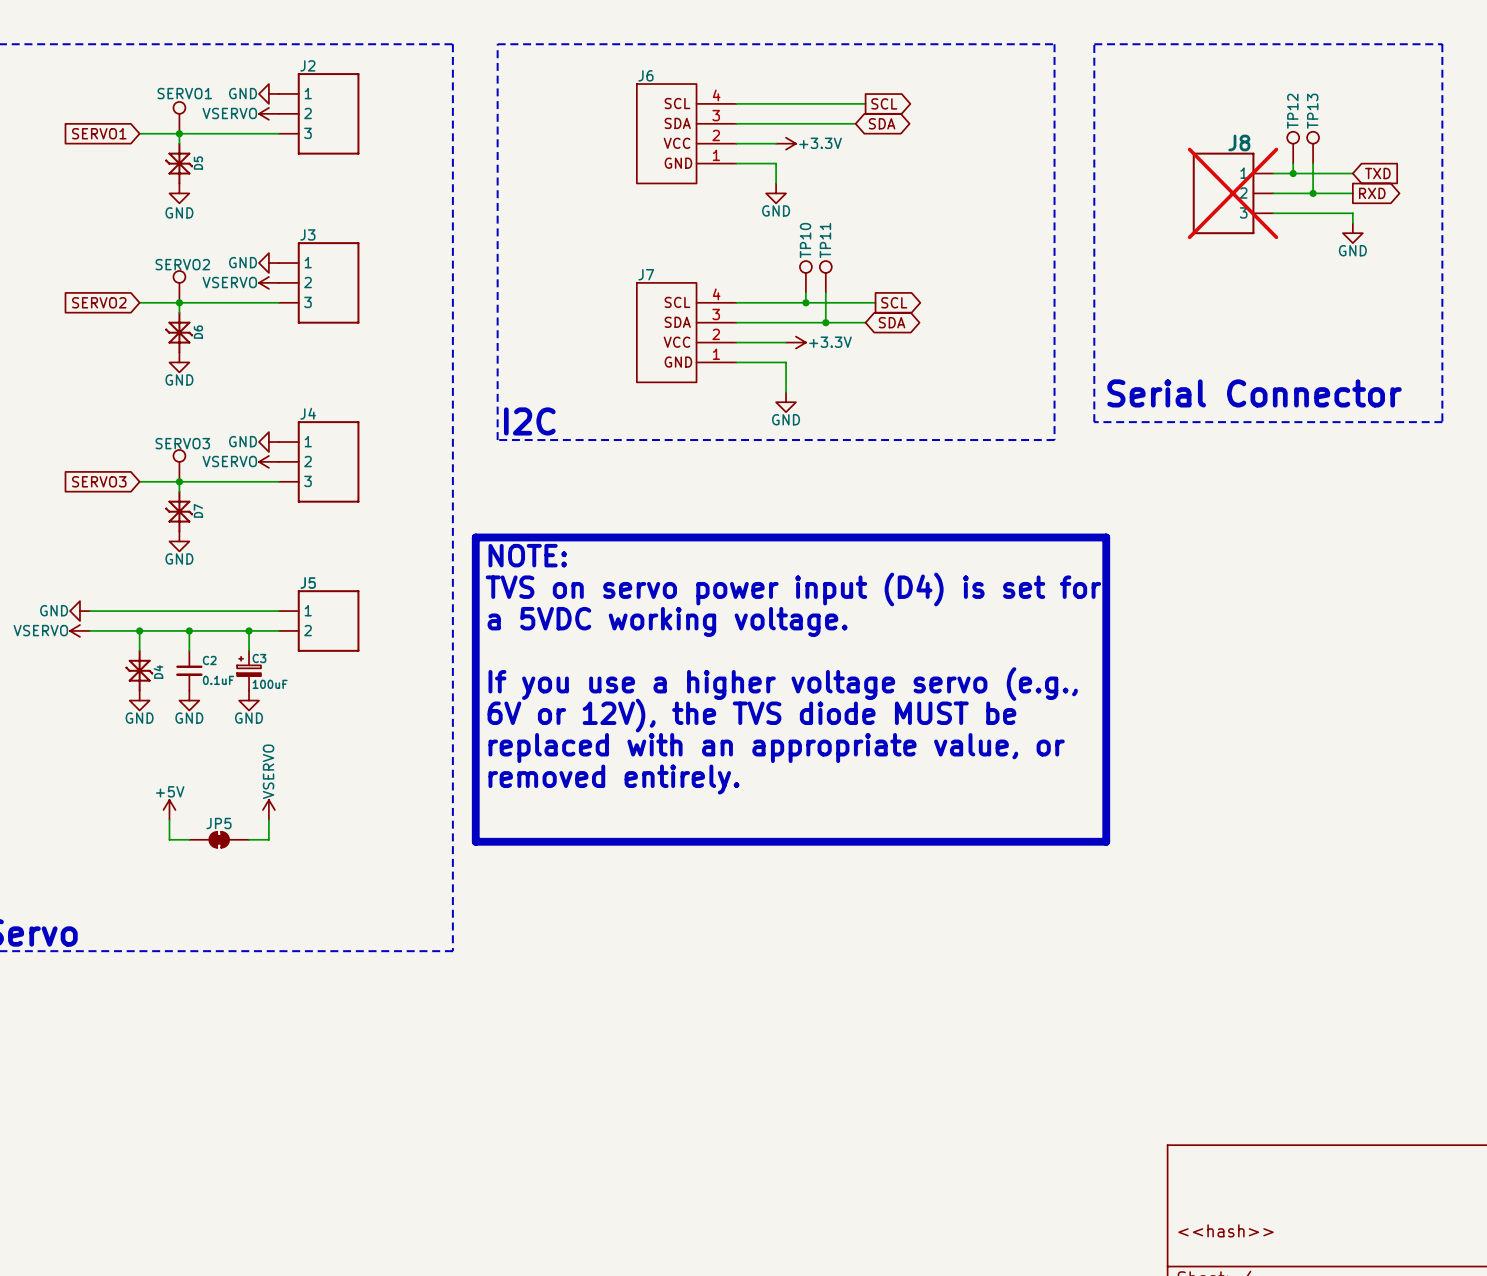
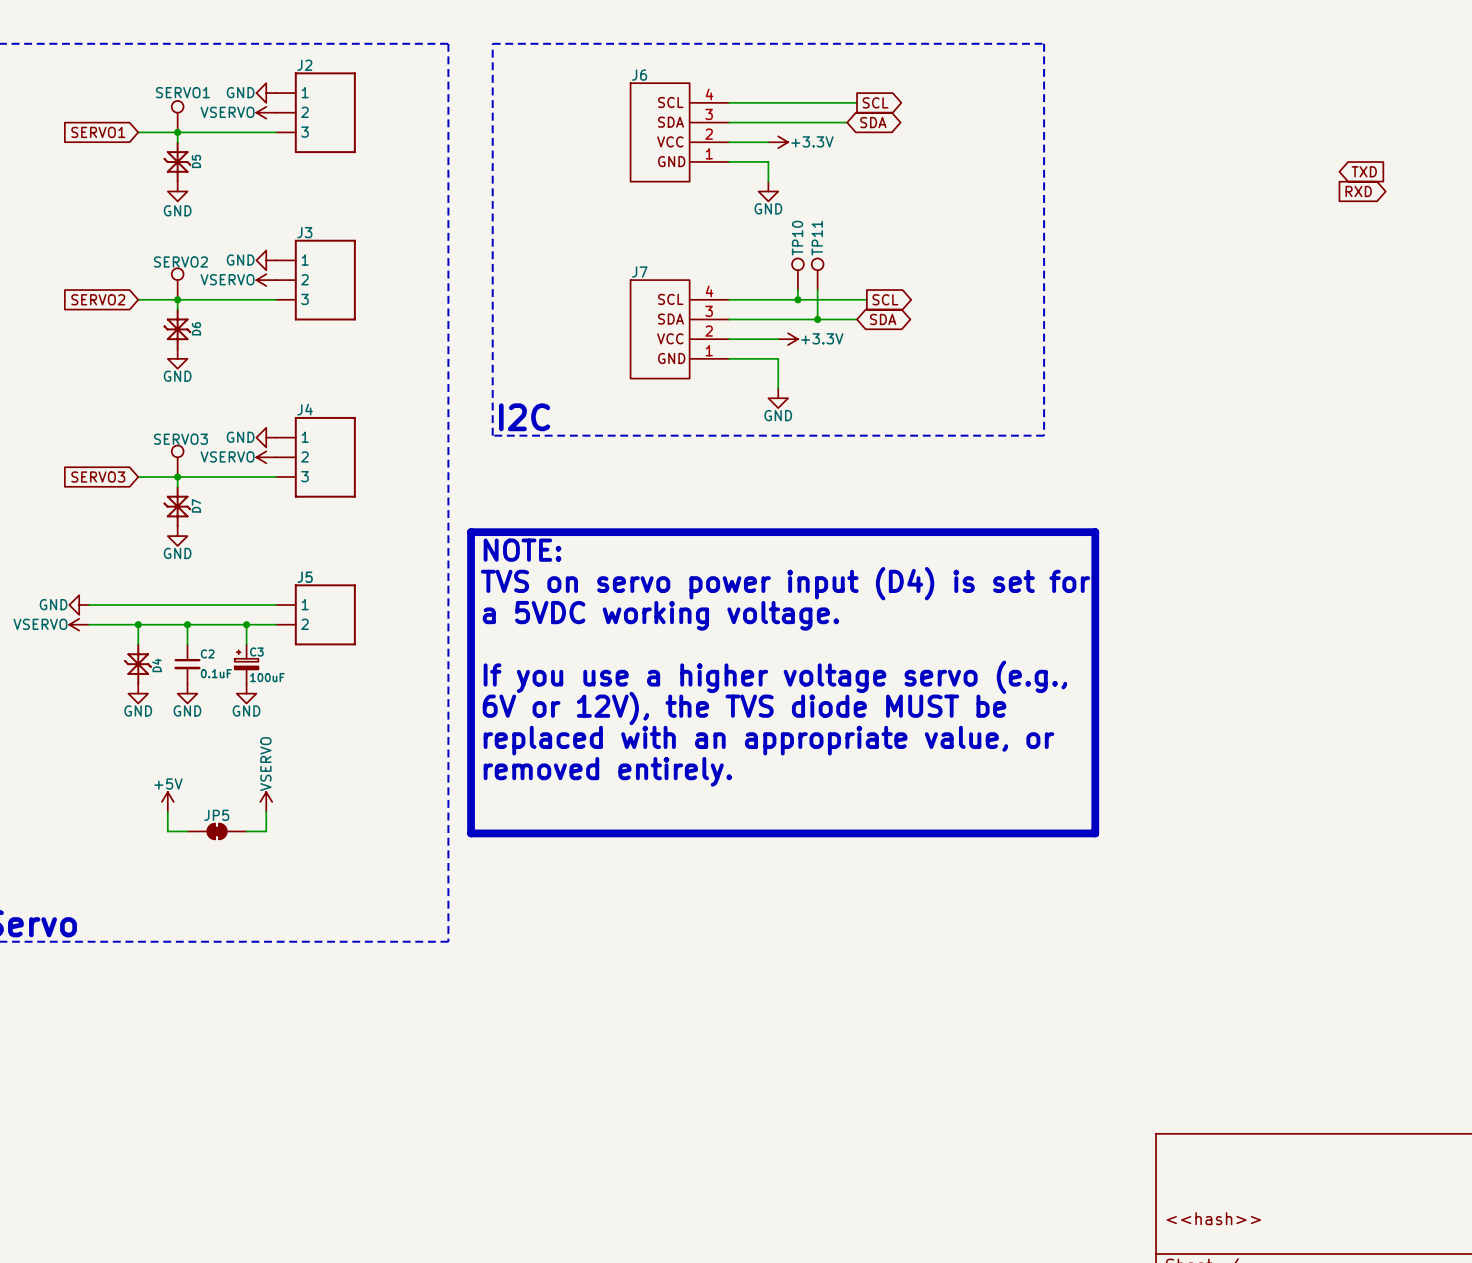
line: (1094, 44) (1442, 44) (1442, 422) (1094, 422) (1094, 44) -> none
TP12: (1293, 147) -> none
TP13: (1313, 147) -> none
wire: (1293, 163) (1293, 173) -> none
wire: (1313, 163) (1313, 193) -> none
wire: (1273, 173) (1352, 173) -> none
junction: (1293, 173) -> none
J8: (1233, 193) -> none
wire: (1273, 193) (1352, 193) -> none
junction: (1313, 193) -> none
wire: (1273, 213) (1352, 213) (1352, 223) -> none
power symbol: GND (1352, 233) -> none
text: Serial Connector (1254, 393) -> none

